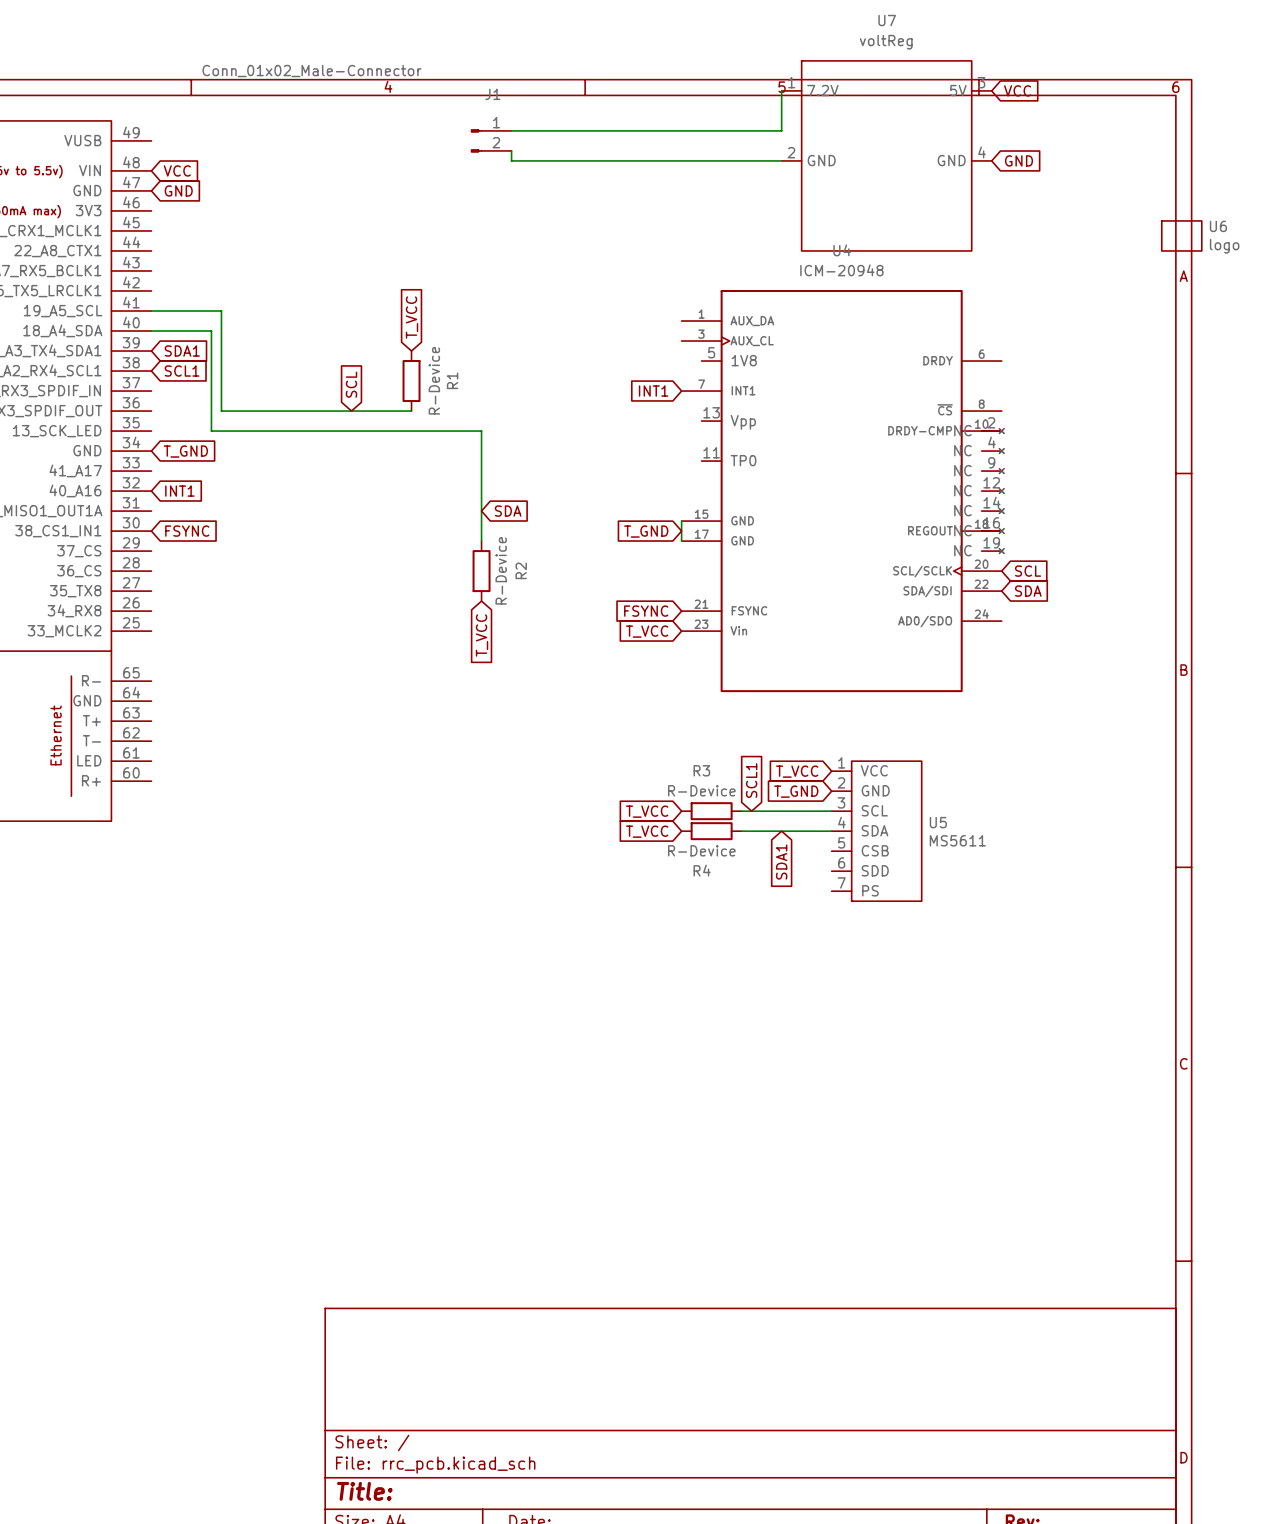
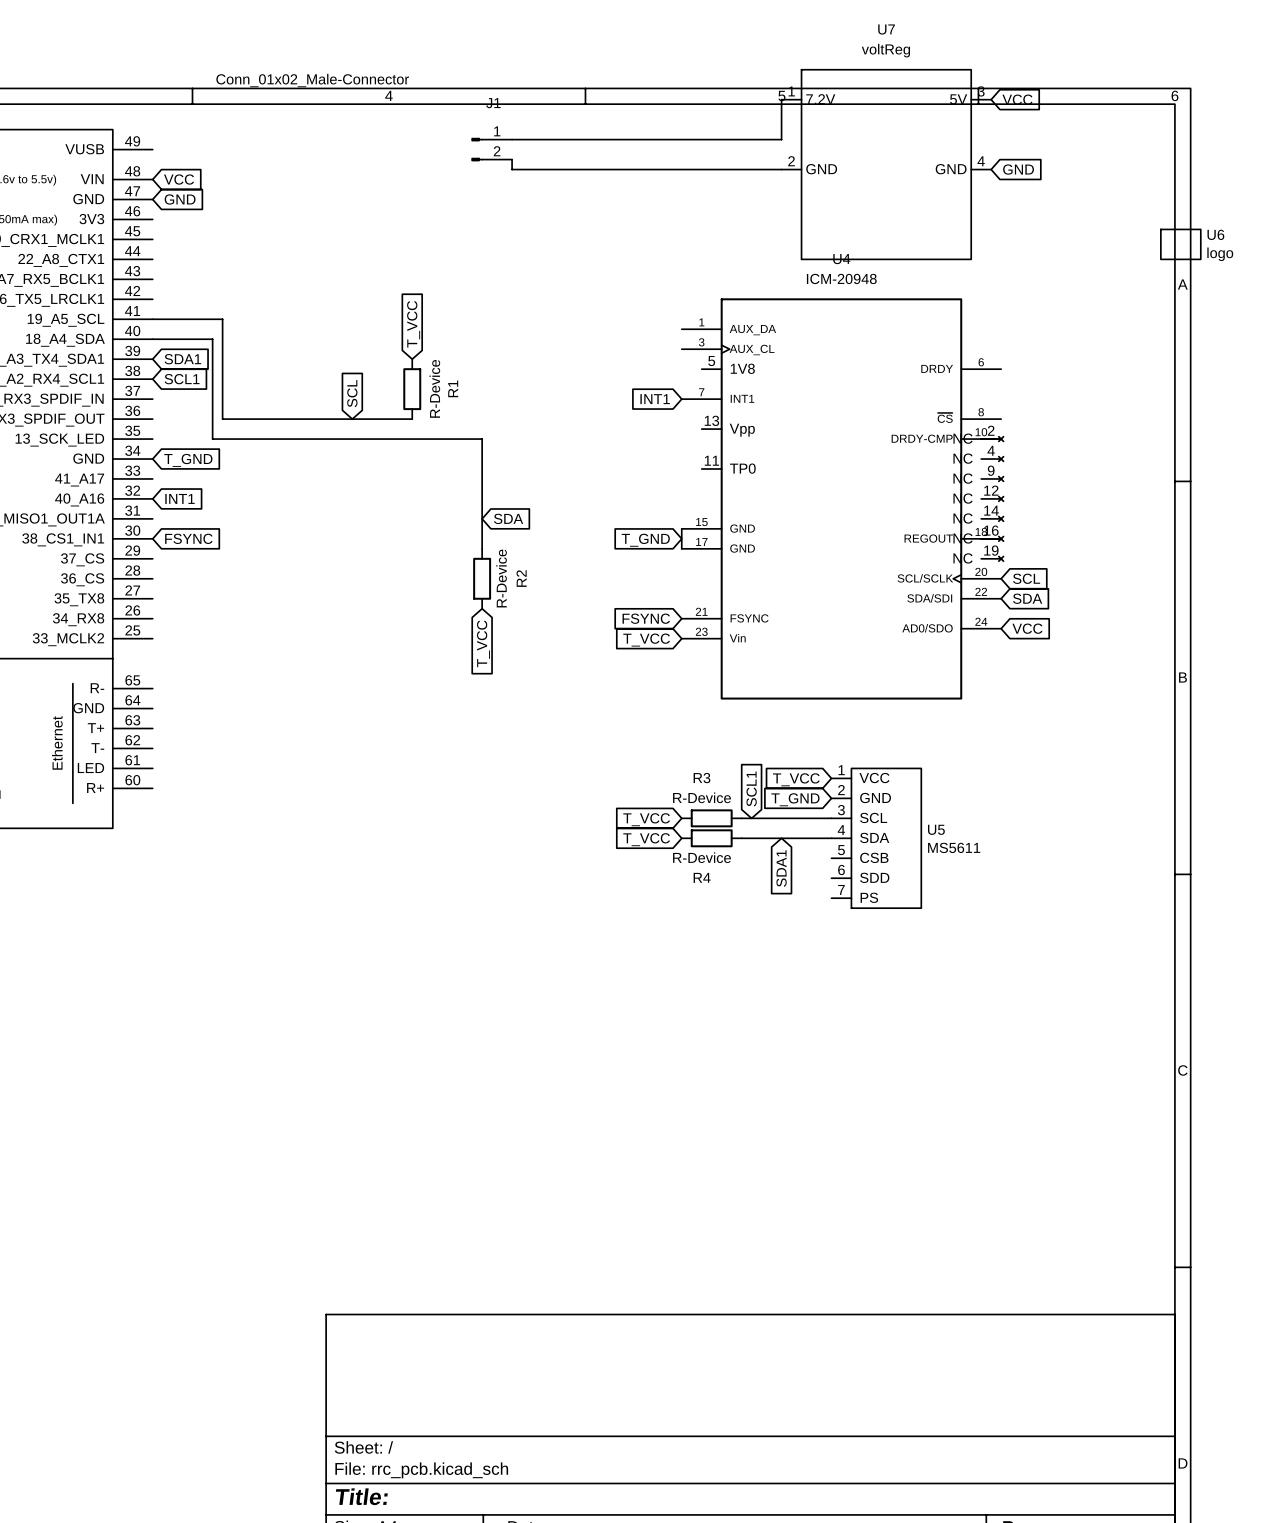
global label: none -> VCC (1027, 628)

